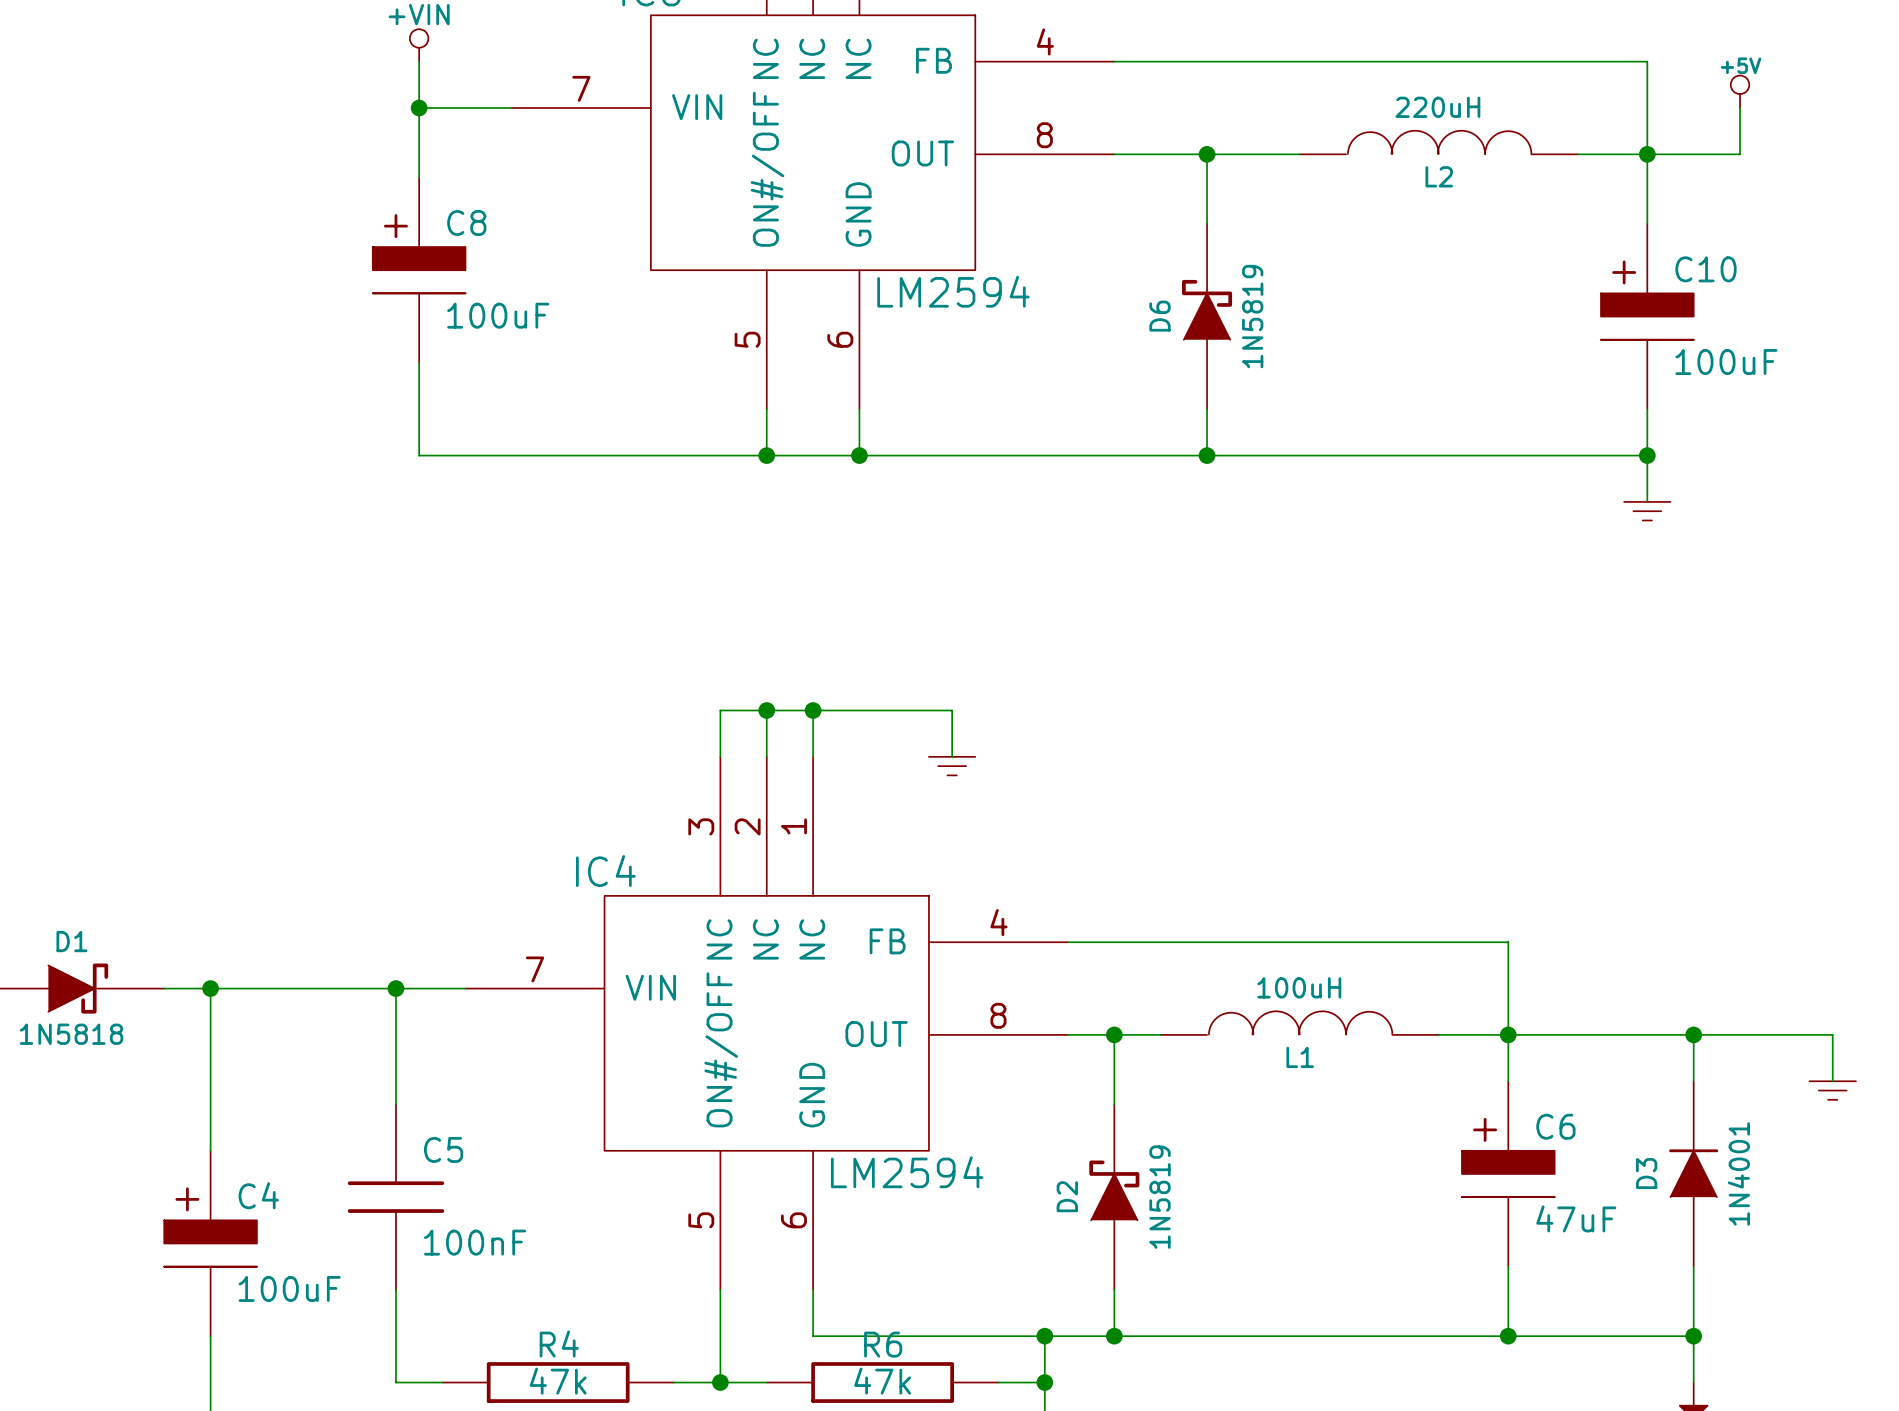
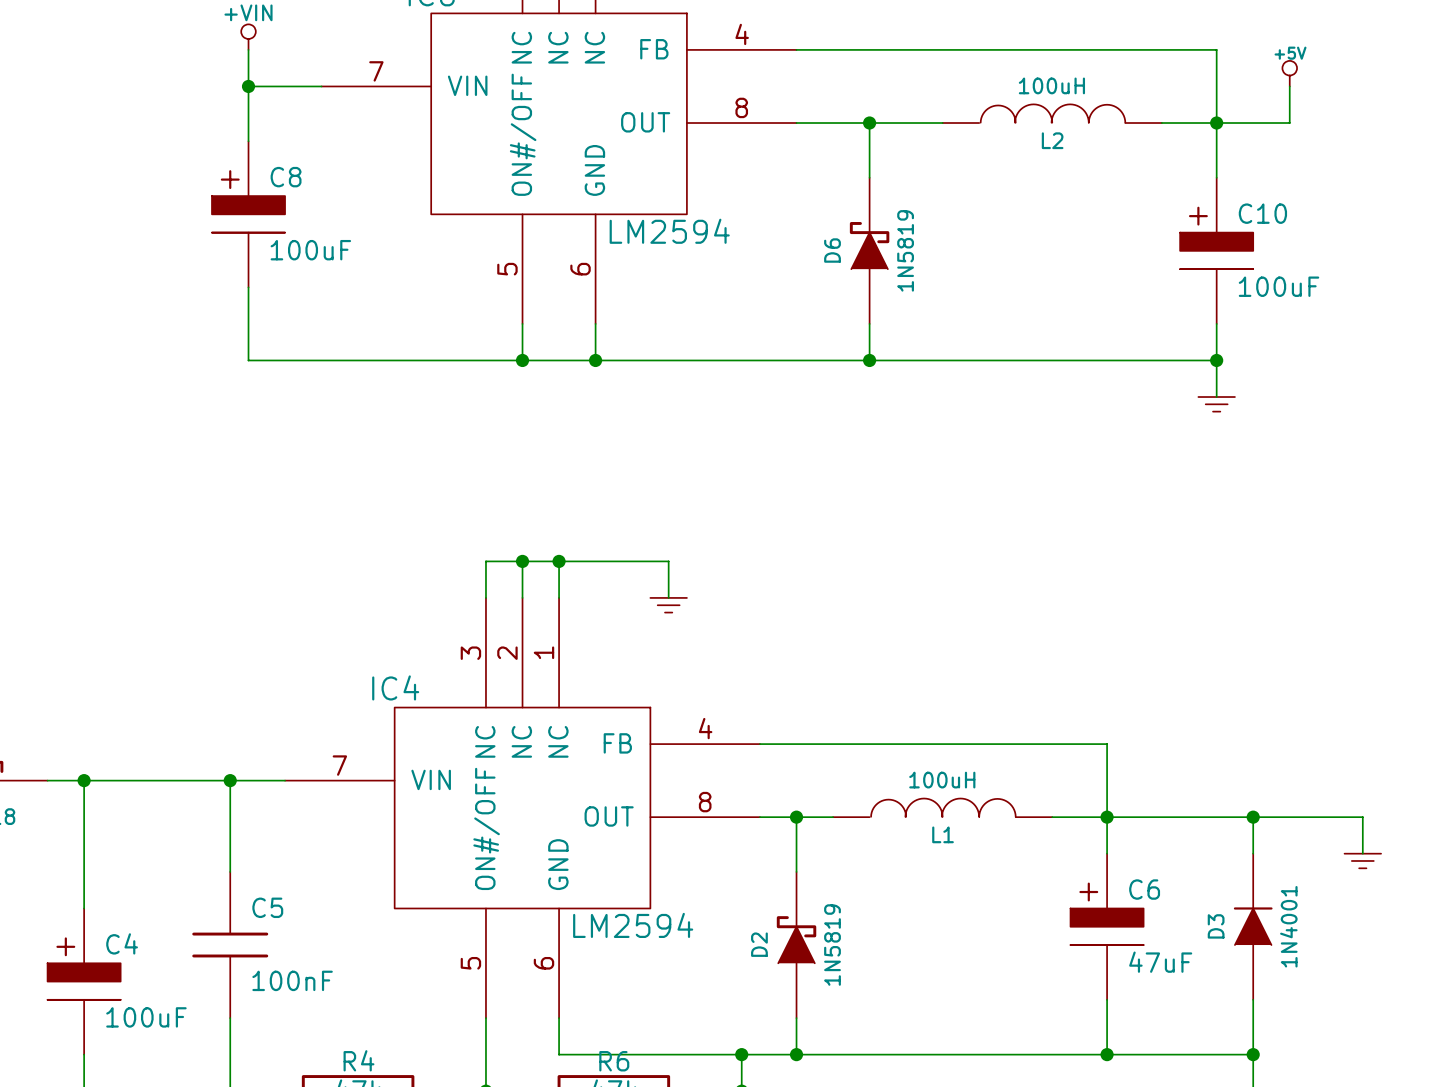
L2 value: 220uH (1437, 107) -> 100uH (1051, 85)

